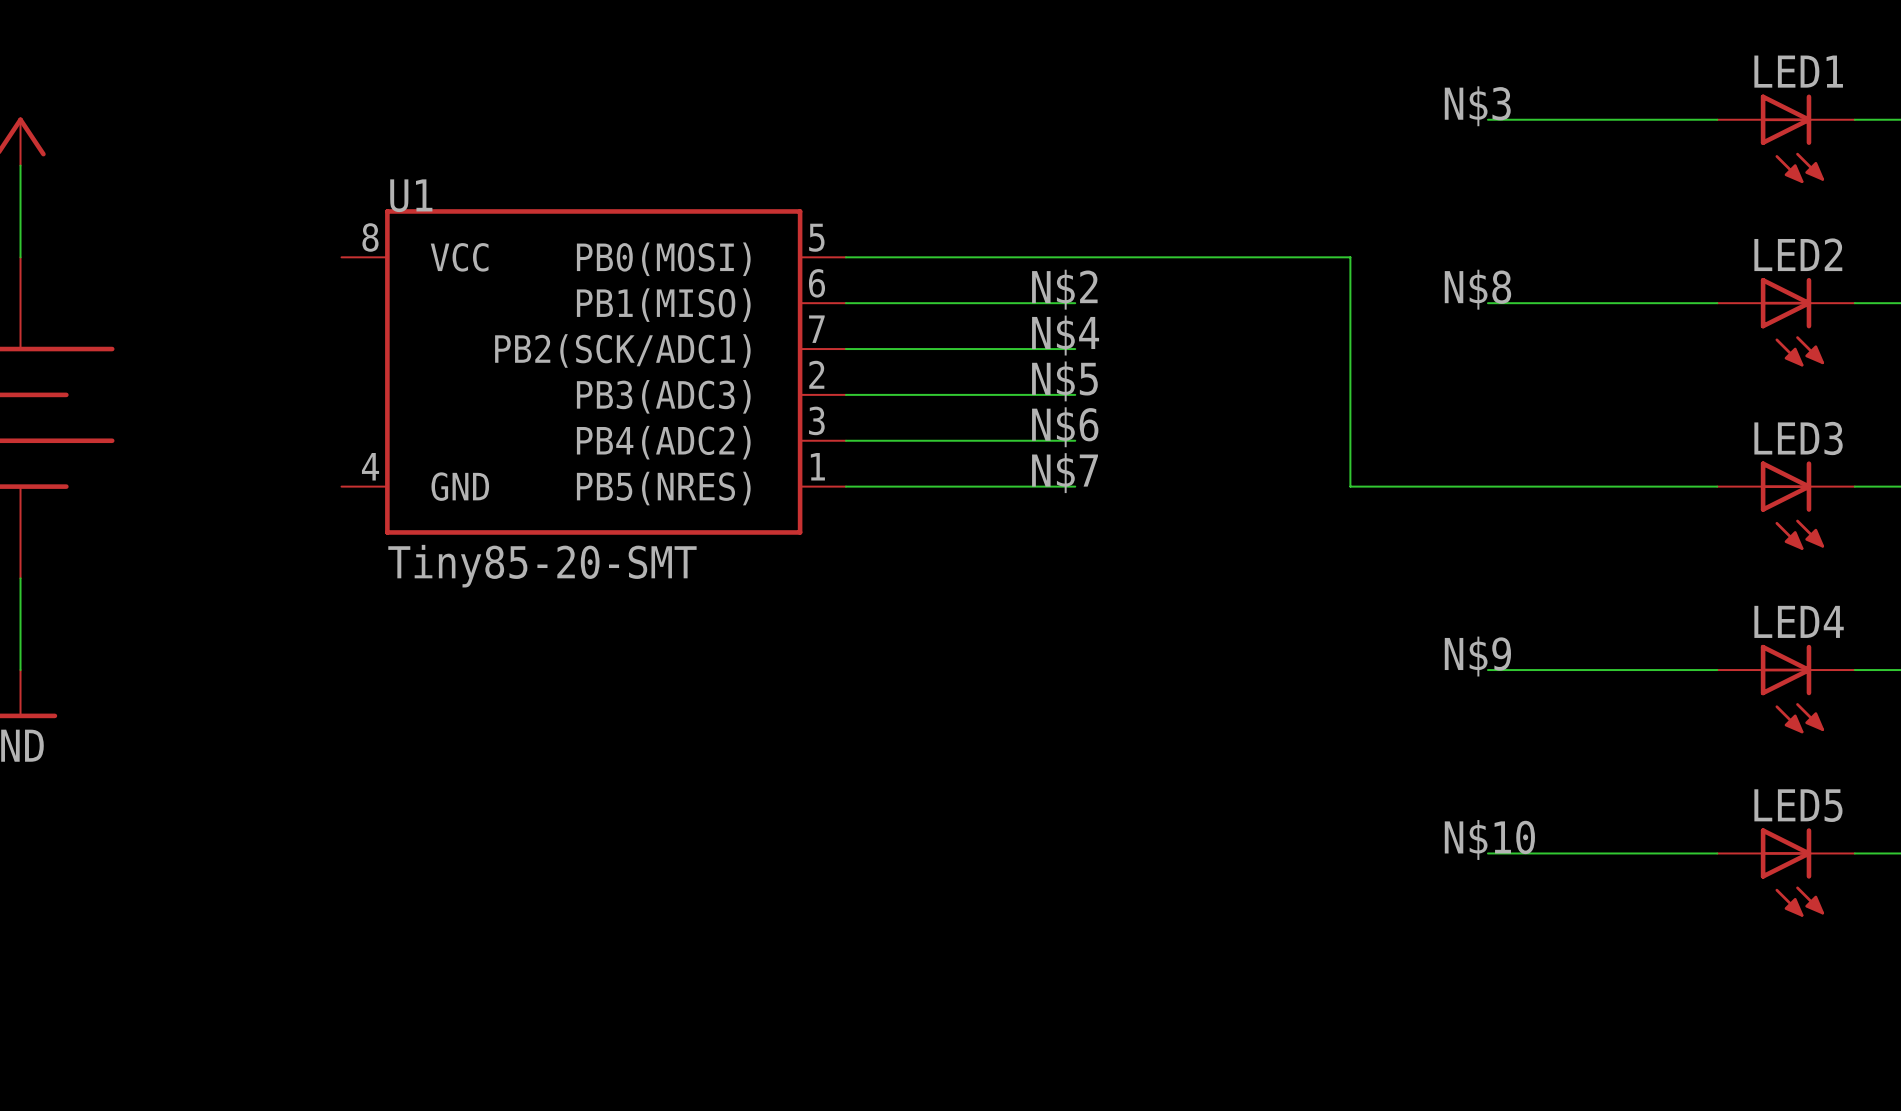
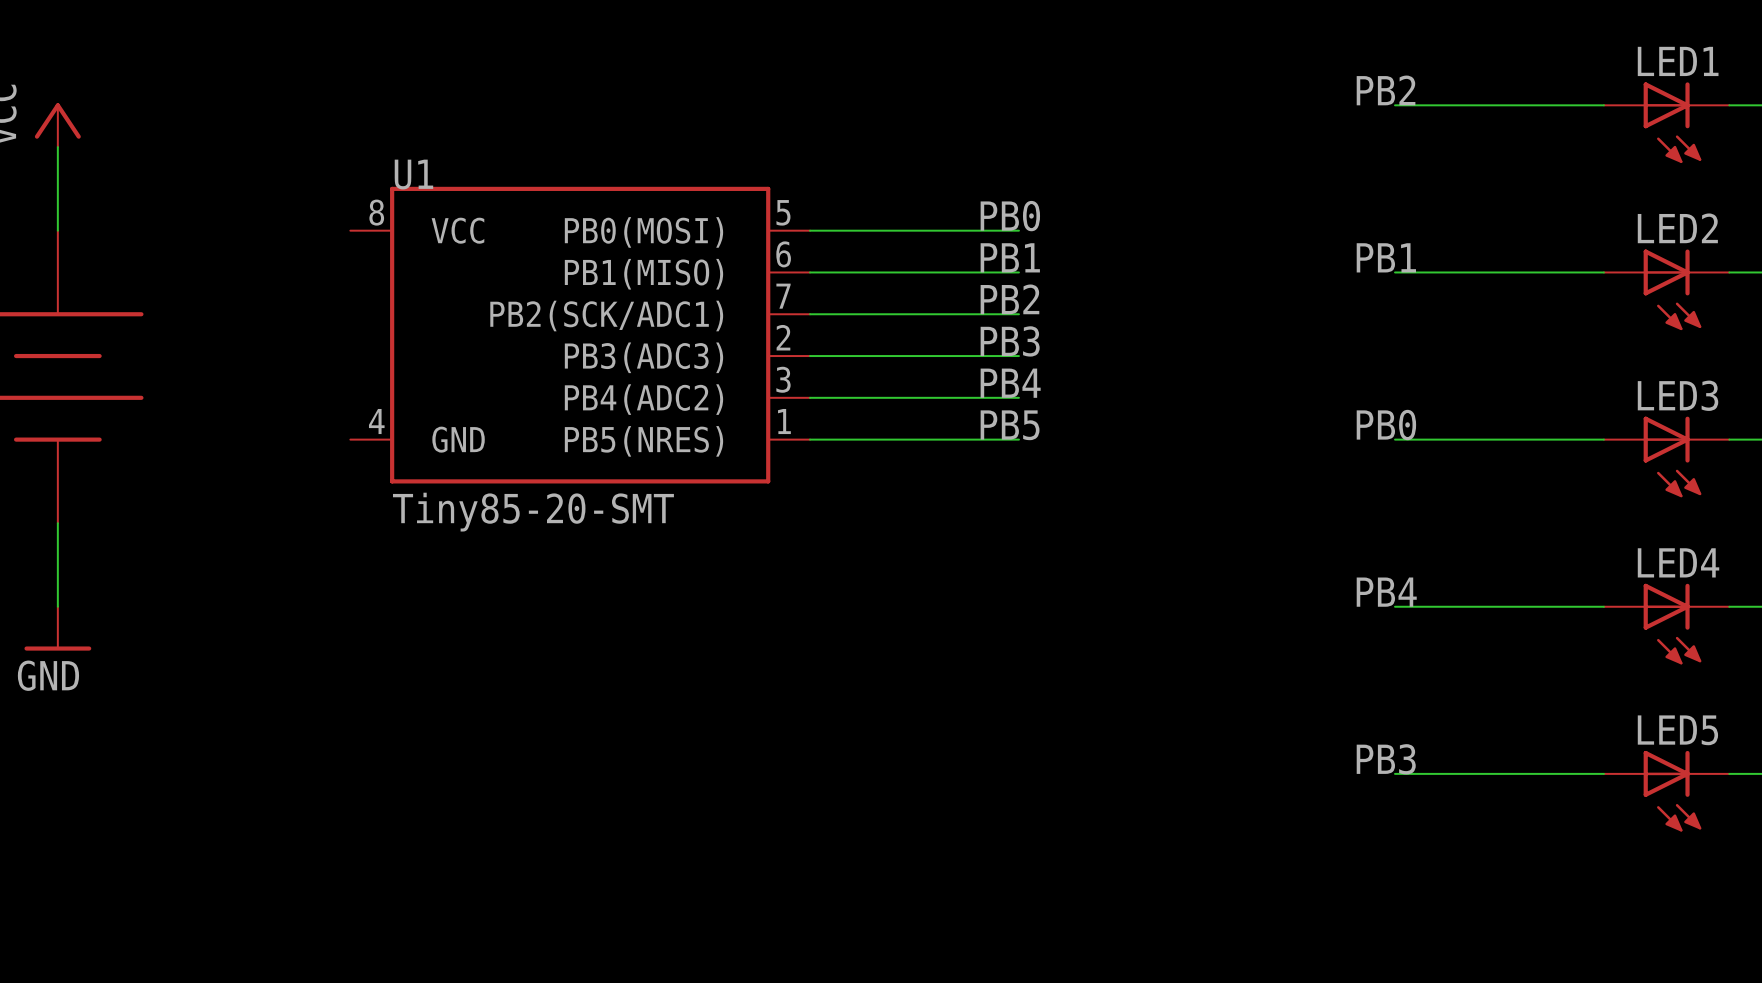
label: N$3 (1477, 106) -> PB2 (1386, 90)
label: none -> PB0 (1010, 216)
wire: (1075, 257) (1350, 257) (1350, 486) (1487, 486) -> none
label: N$2 (1064, 289) -> PB1 (1010, 257)
label: N$8 (1477, 289) -> PB1 (1386, 257)
label: N$4 (1065, 335) -> PB2 (1009, 299)
label: N$5 (1064, 381) -> PB3 (1010, 341)
label: N$6 (1065, 427) -> PB4 (1010, 383)
label: none -> PB0 (1386, 425)
label: N$7 (1065, 473) -> PB5 (1010, 425)
label: N$9 (1477, 656) -> PB4 (1386, 592)
label: N$10 (1489, 839) -> PB3 (1386, 759)

